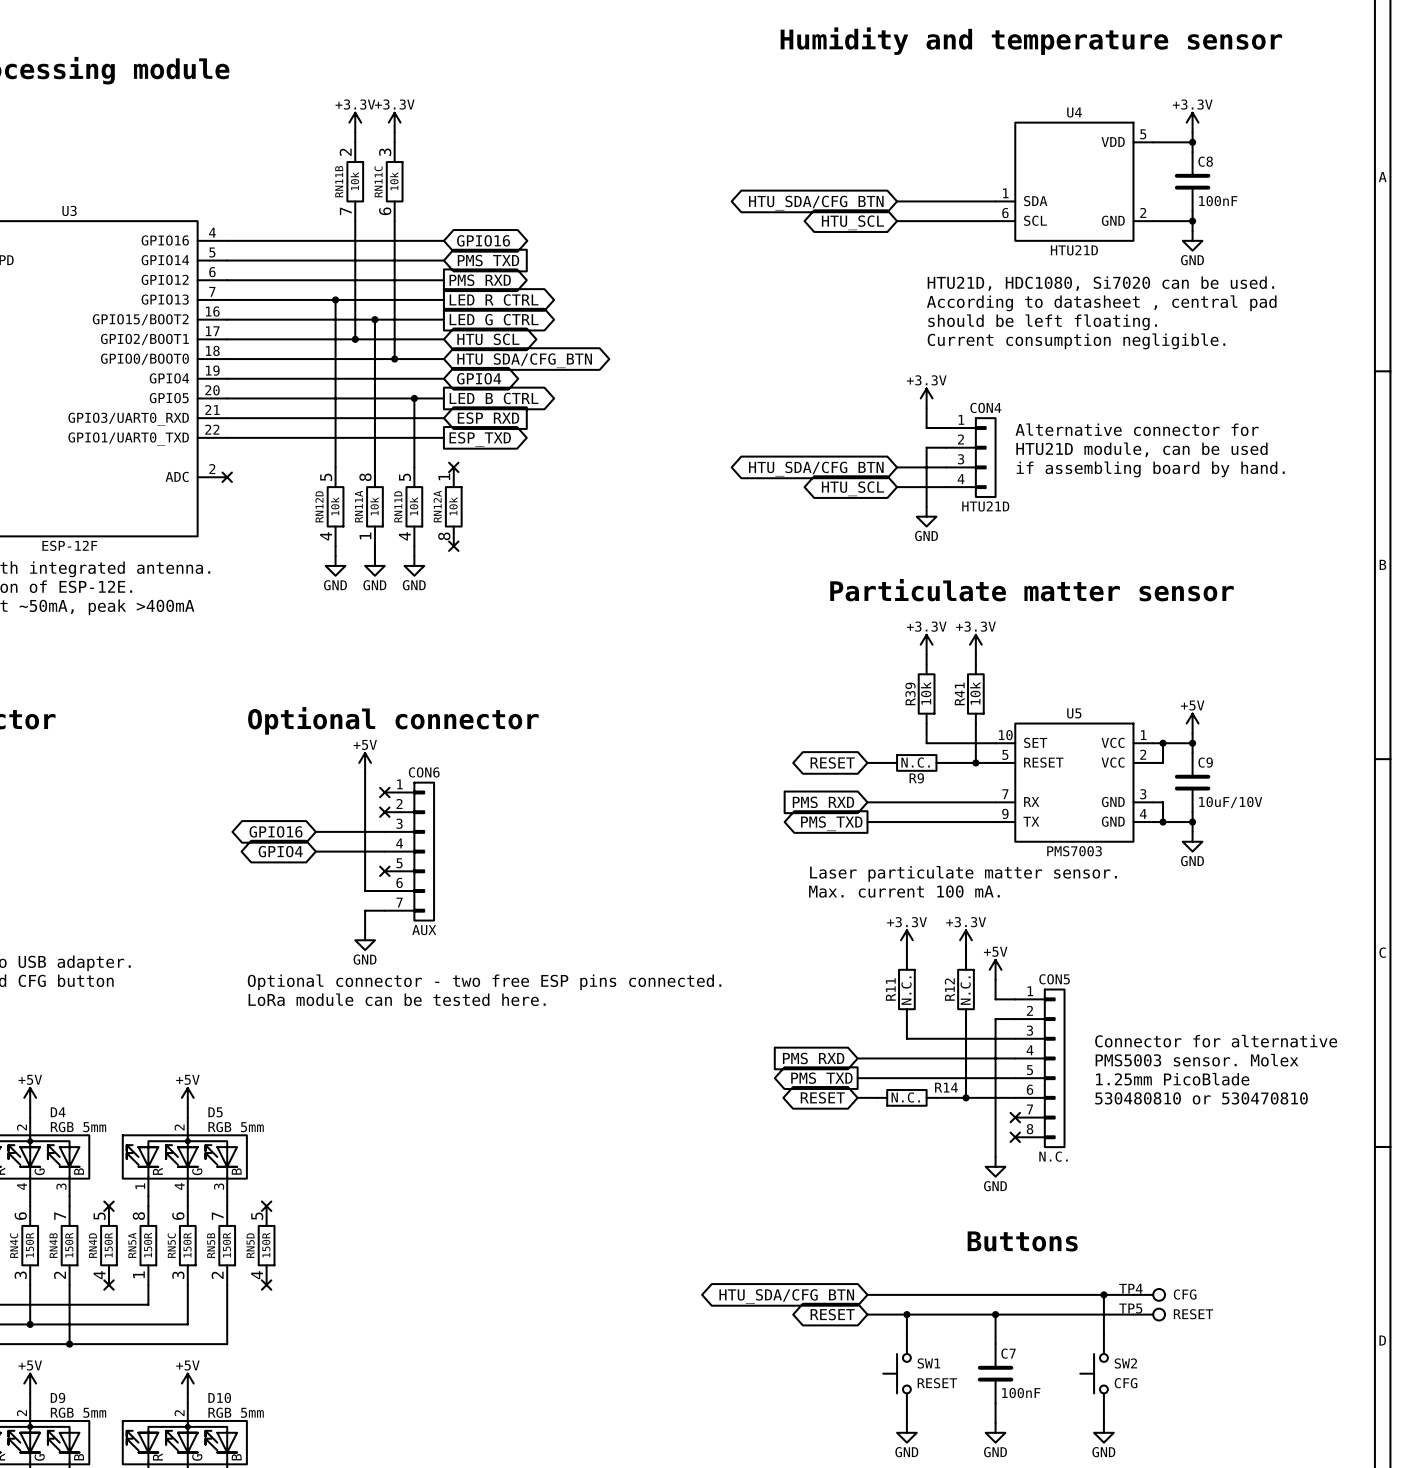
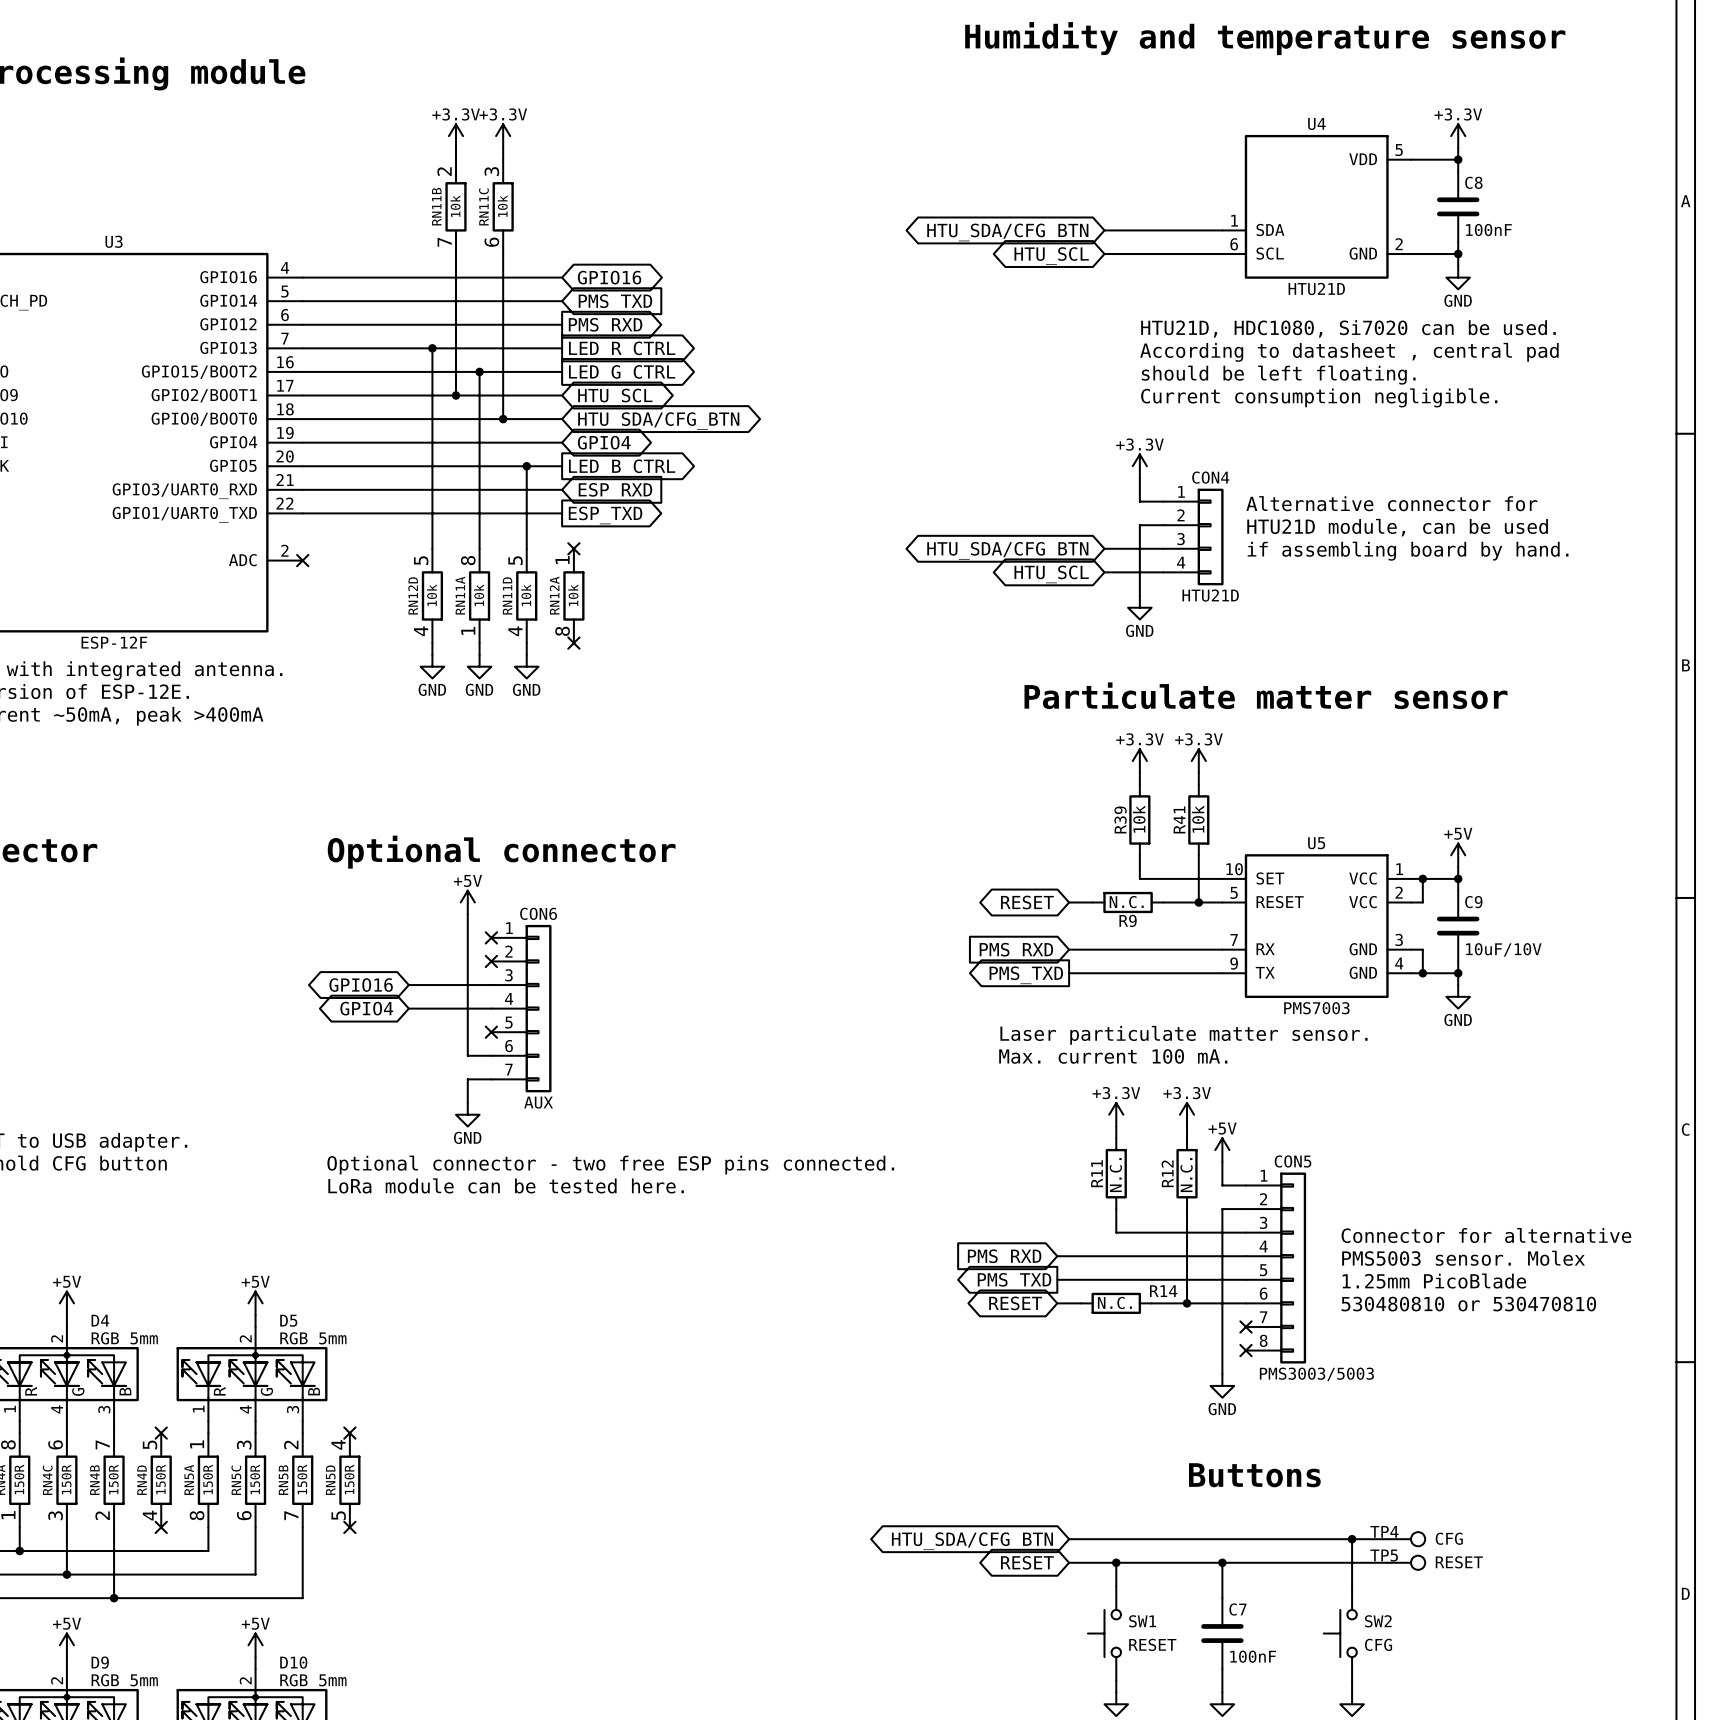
CON5 value: N.C. (1053, 1156) -> PMS3003/5003 (1316, 1374)
RN5A rotation: 0° (148, 1245) -> 180° (208, 1480)
RN5C rotation: 0° (187, 1245) -> 180° (255, 1480)
RN5B rotation: 0° (227, 1245) -> 180° (302, 1480)
RN5D rotation: 0° (266, 1245) -> 180° (349, 1480)

